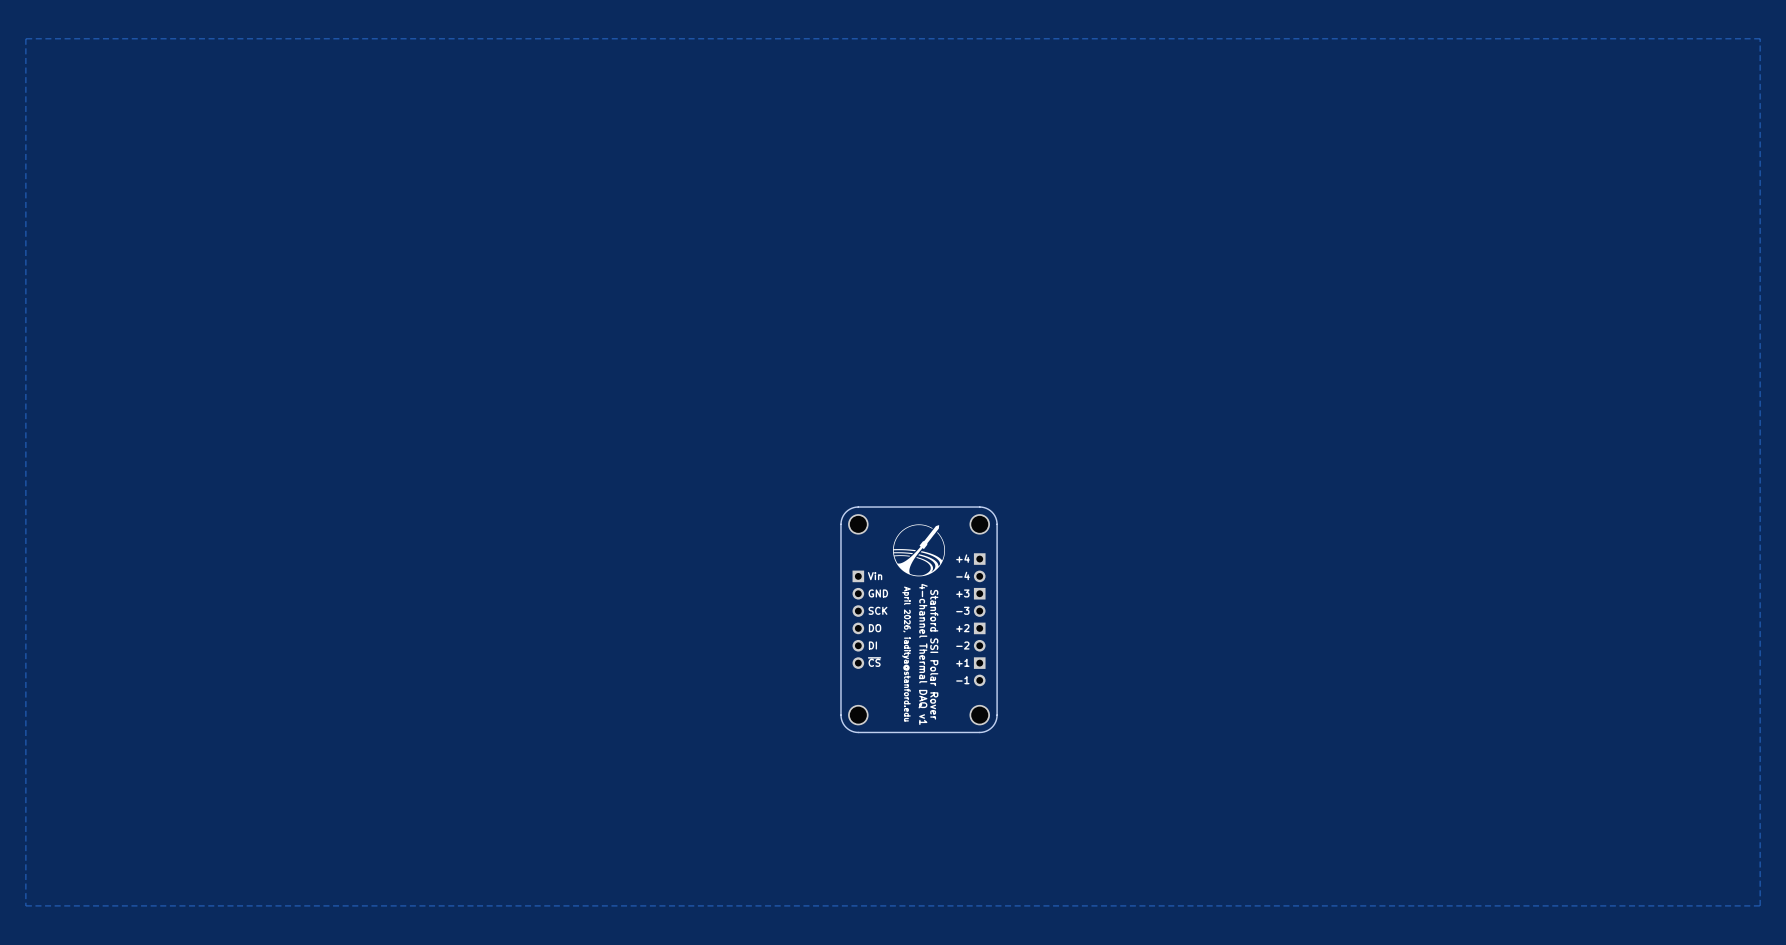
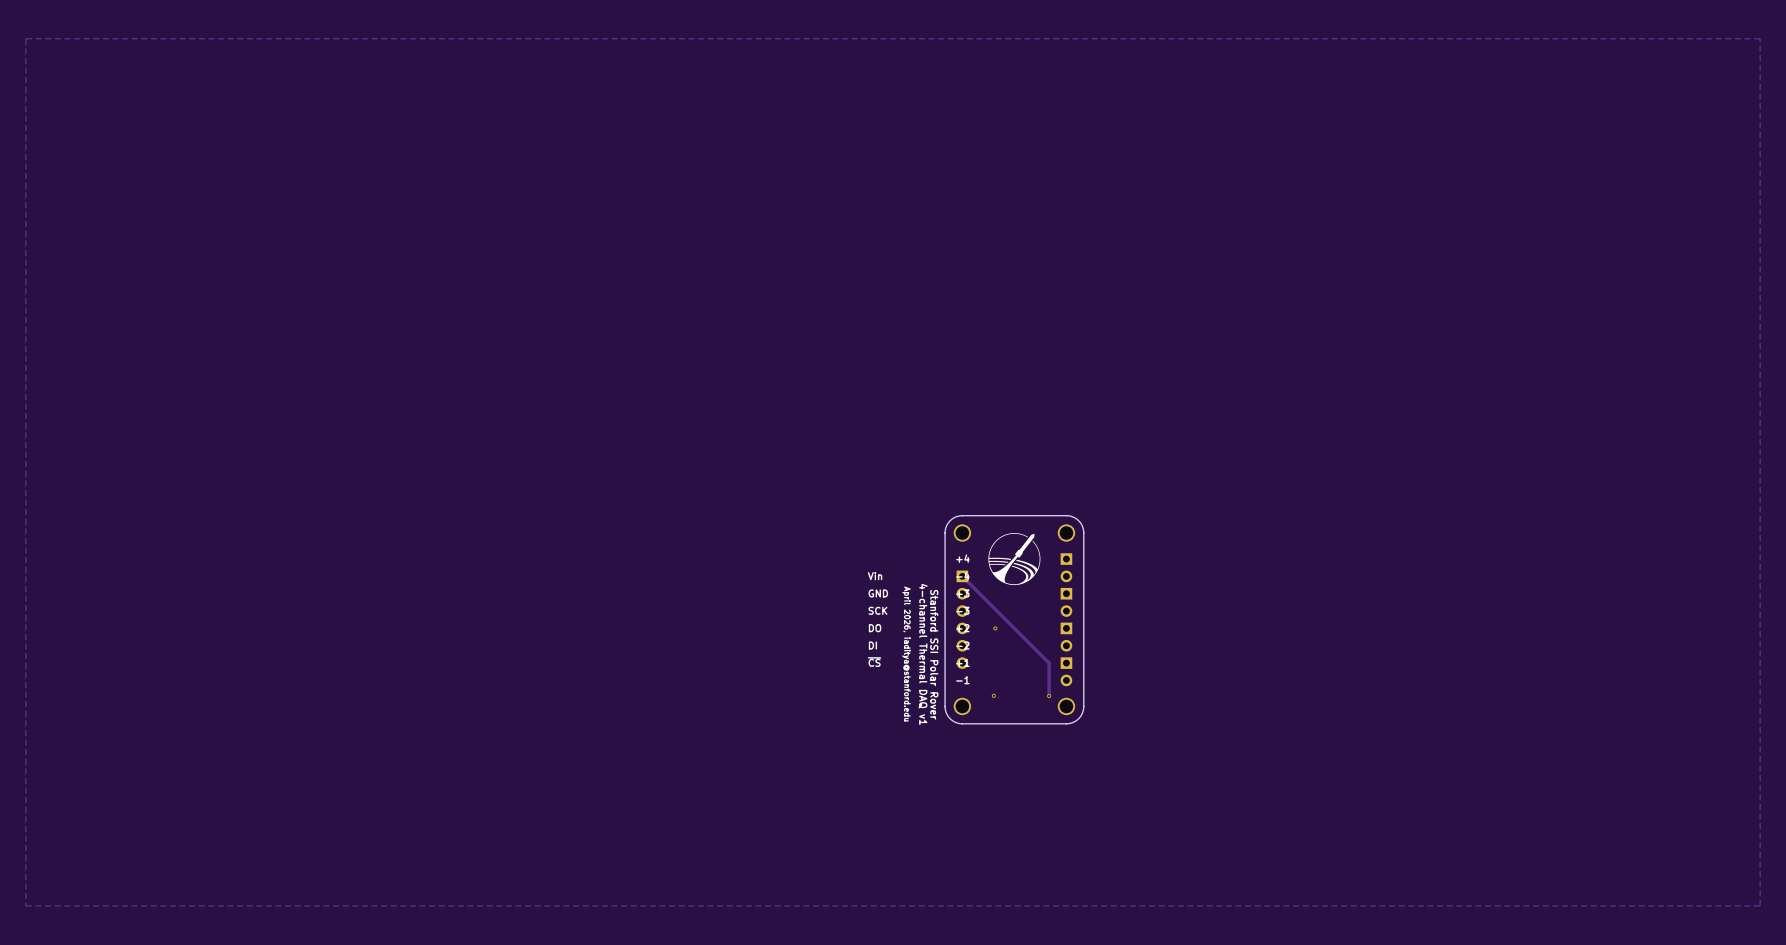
board edge: (979, 507) (858, 507) (849, 509) (843, 515) (840, 524) (840, 715) (843, 723) (849, 730) (858, 732) (979, 732) (988, 730) (994, 723) (997, 715) (996, 522) (990, 510) (979, 507) -> none
board edge: none -> (1066, 515) (960, 515) (951, 519) (947, 524) (945, 533) (945, 706) (947, 715) (953, 721) (962, 723) (1066, 723) (1075, 721) (1081, 715) (1083, 706) (1083, 530) (1078, 520) (1066, 515)
part: (858, 524) -> none
part: (979, 524) -> none
part: none -> (962, 533)
part: none -> (1066, 533)
drawing position: (919, 550) -> (1014, 559)
part: (979, 567) -> none
part: none -> (1066, 567)
track: none -> (962, 576) (1049, 663) (1049, 696)
part: (979, 602) -> none
part: none -> (1066, 602)
part position: (858, 619) -> (962, 619)
via: none -> (995, 628)
part: (979, 637) -> none
part: none -> (1066, 637)
part: (979, 671) -> none
part: none -> (1066, 671)
via: none -> (993, 695)
via: none -> (1049, 696)
part: none -> (962, 706)
part: none -> (1066, 706)
part: (858, 715) -> none
part: (979, 715) -> none

